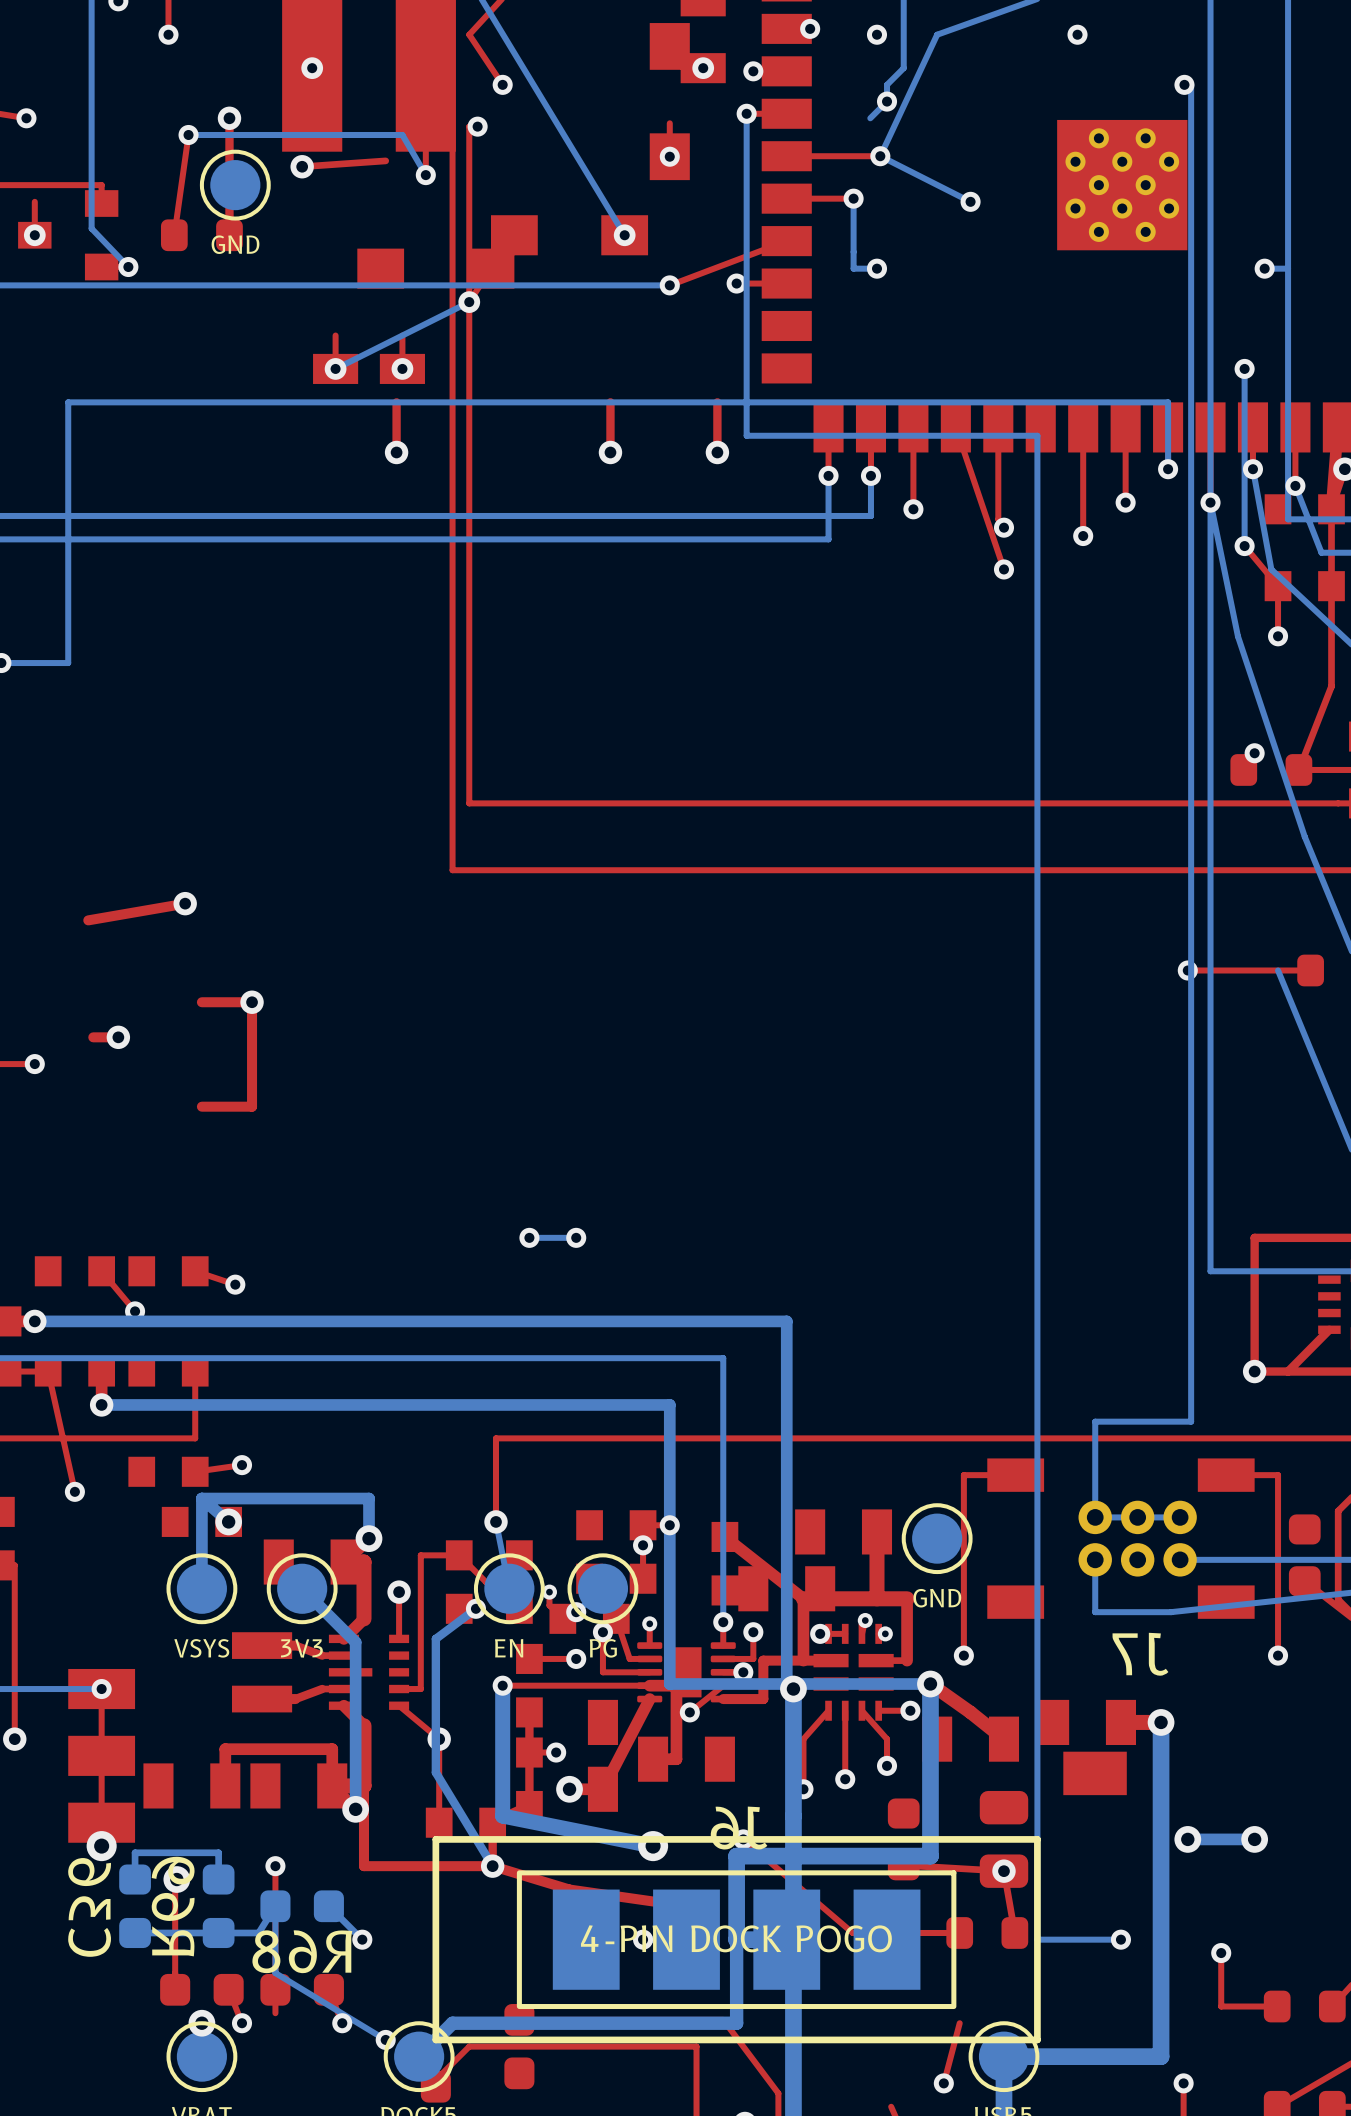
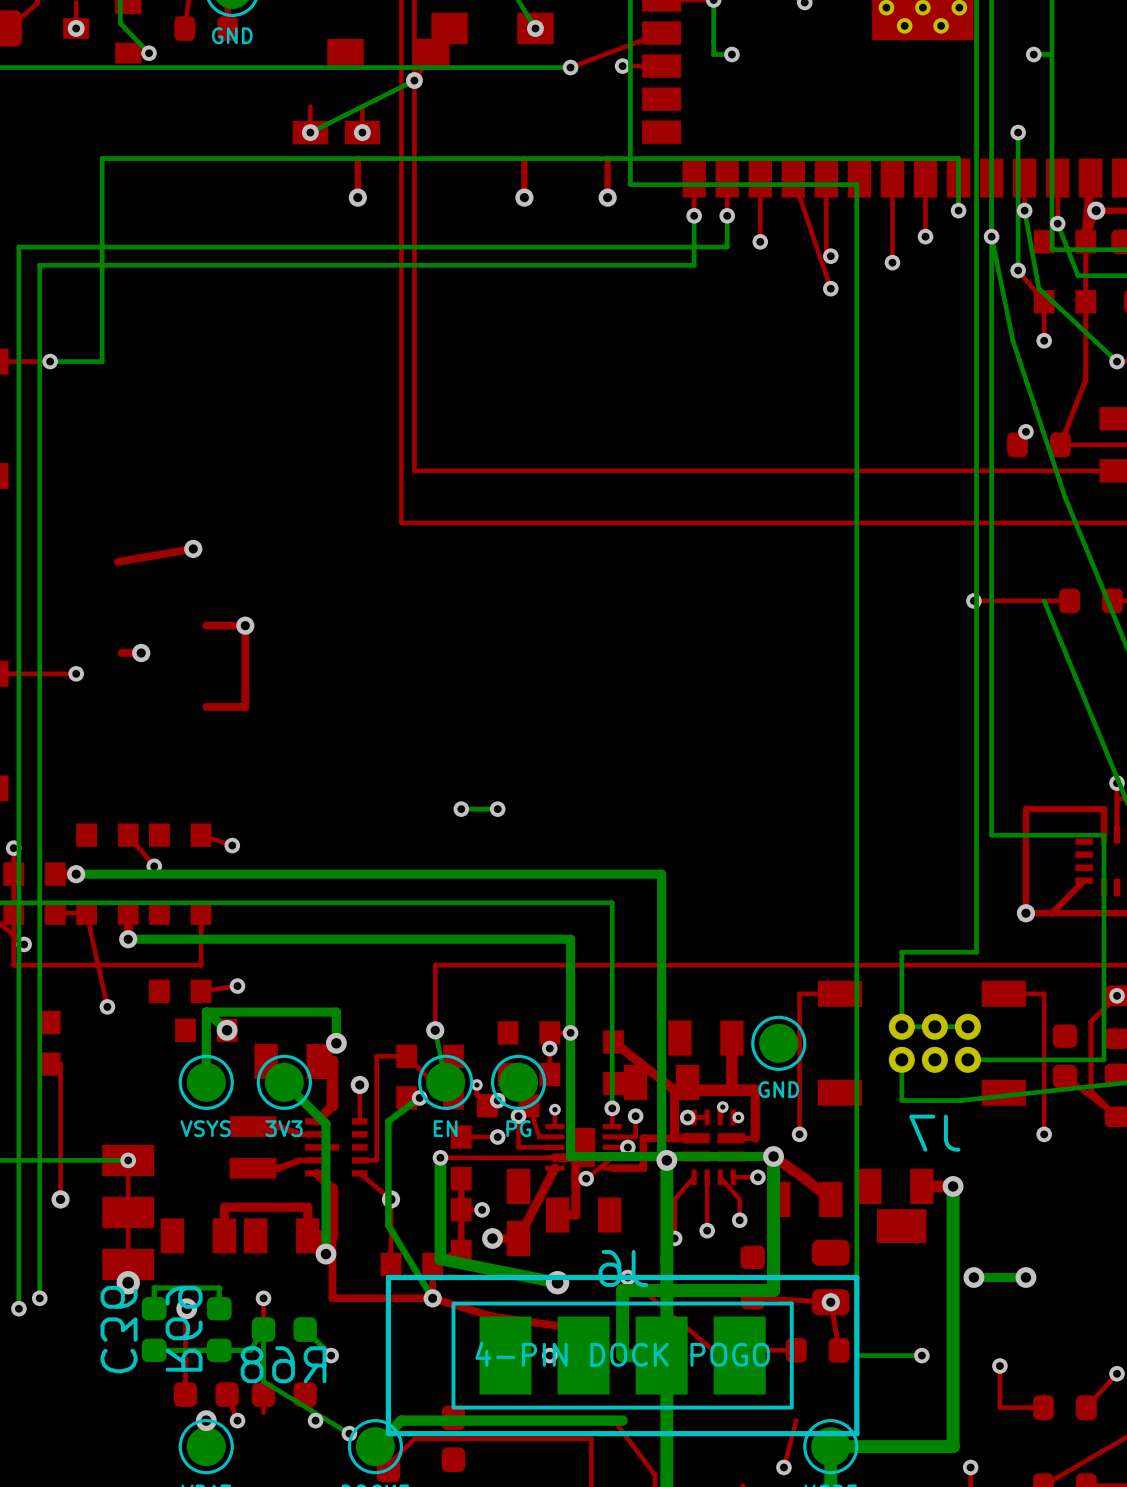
bottom track: (736, 1939) (736, 2023) -> none

